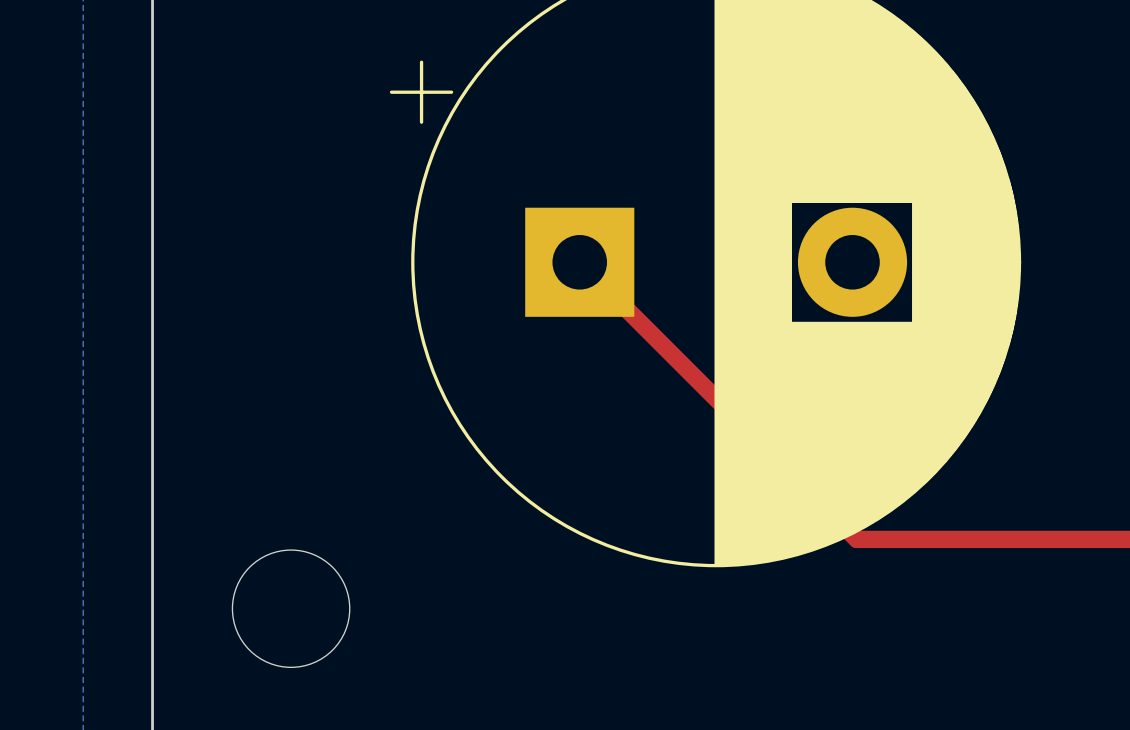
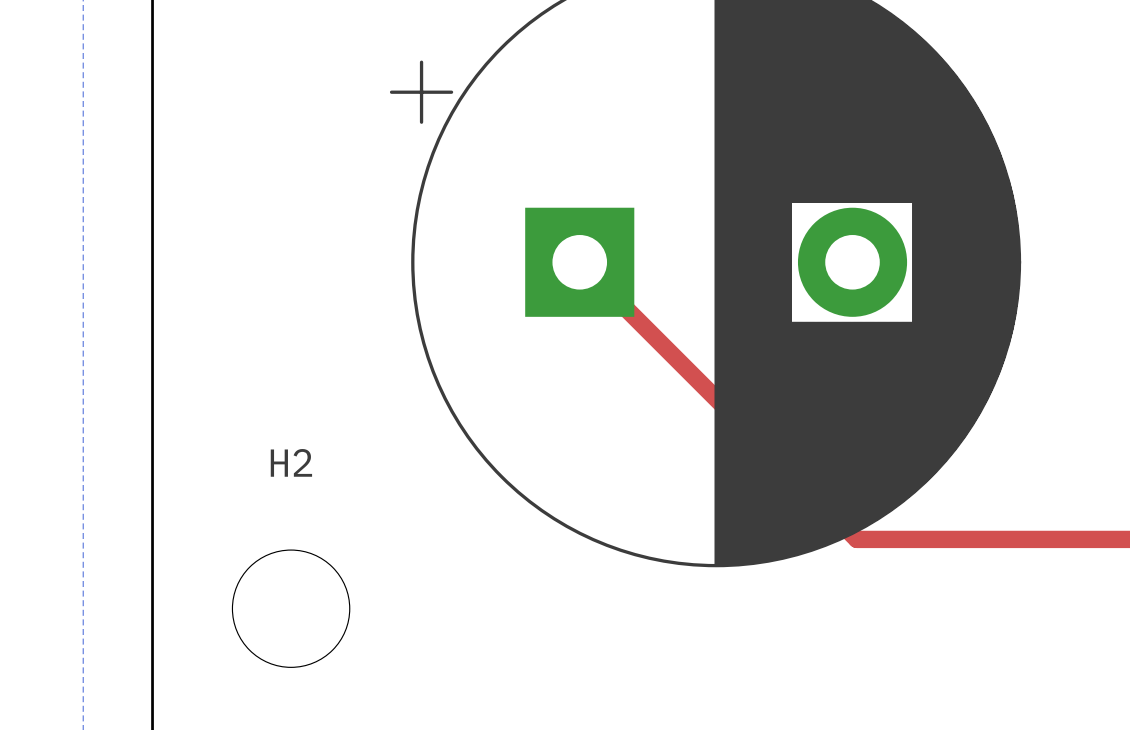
H2 name: none -> H2 (291, 462)

